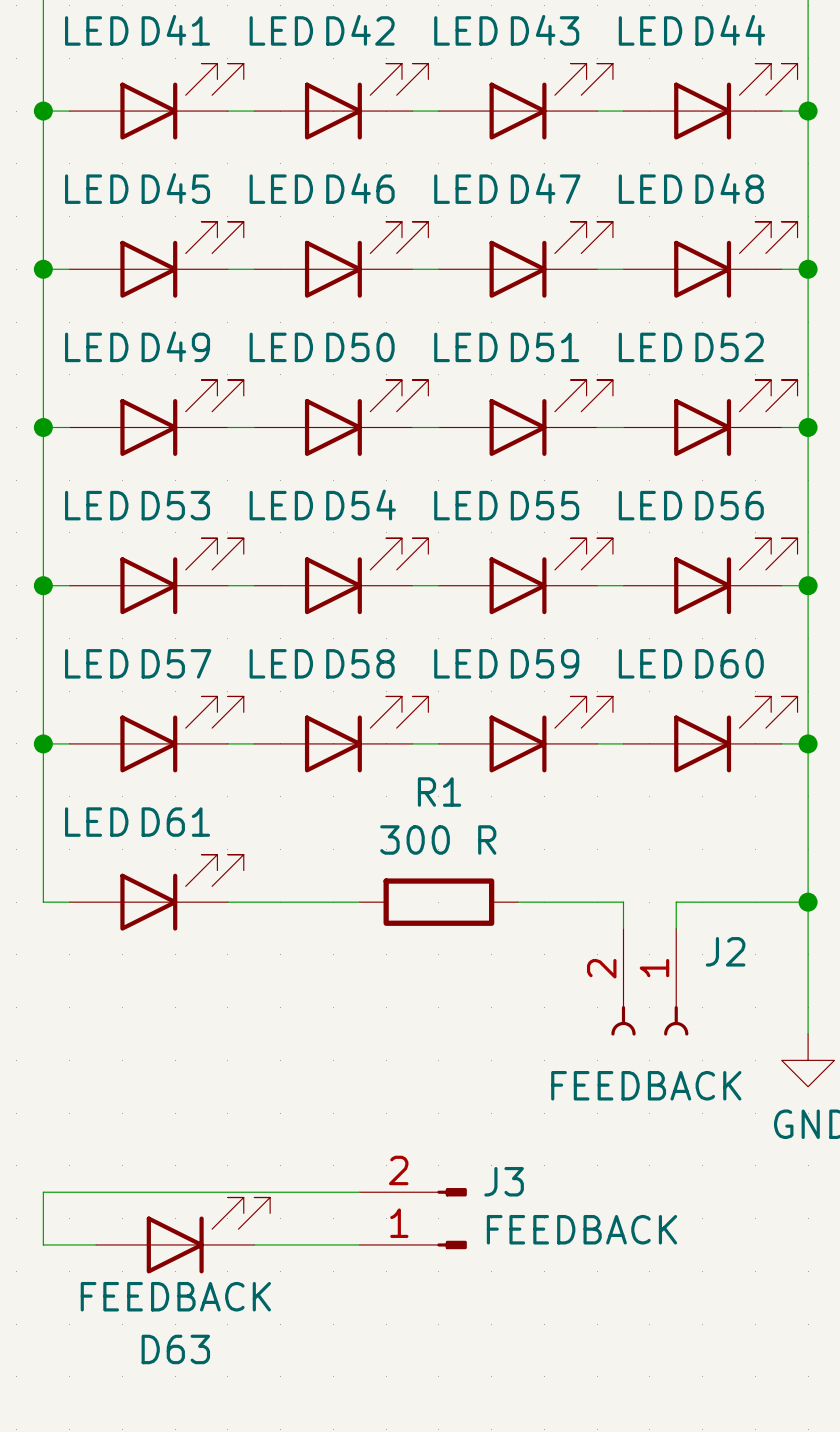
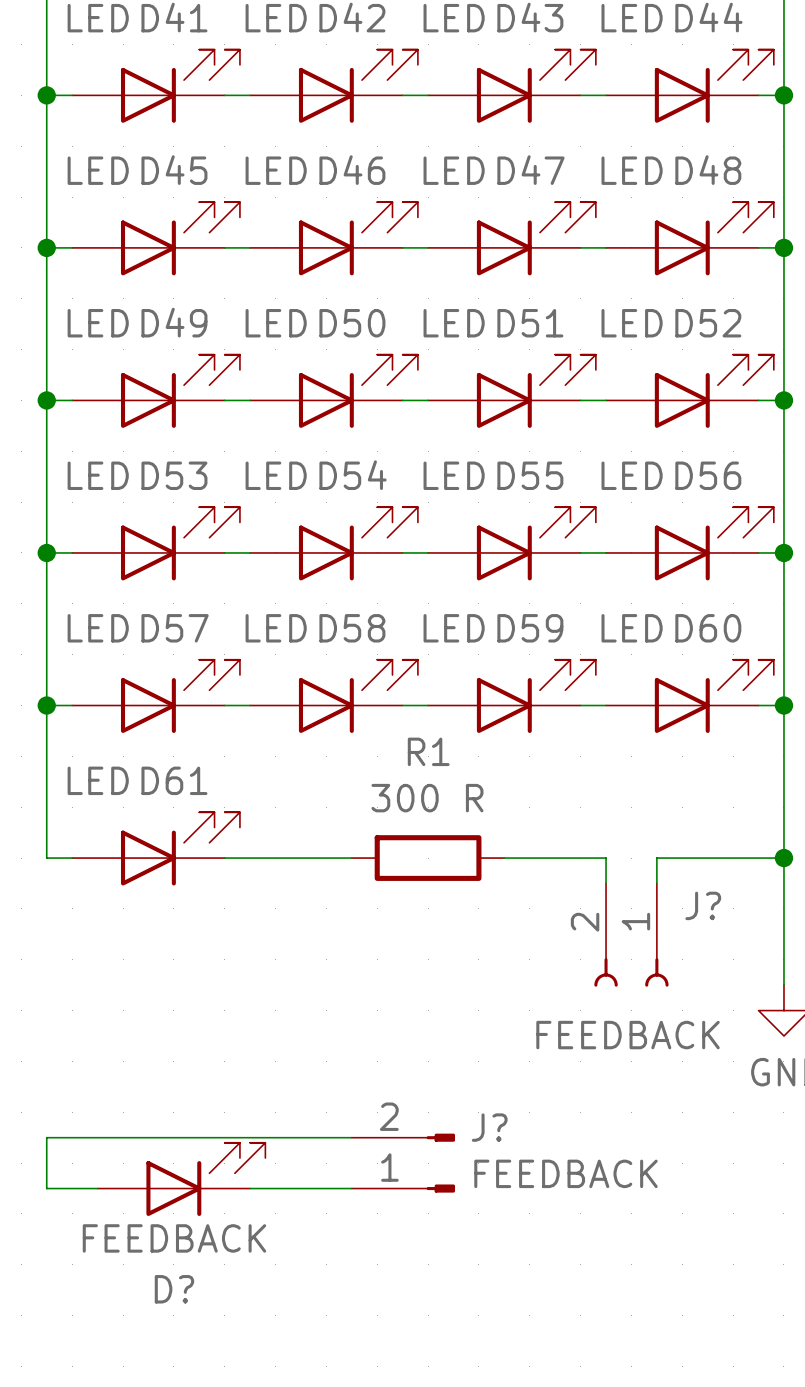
J2 name: J2 (725, 951) -> J? (703, 905)
J3 name: J3 (504, 1181) -> J? (489, 1127)
D63 name: D63 (175, 1349) -> D? (174, 1289)

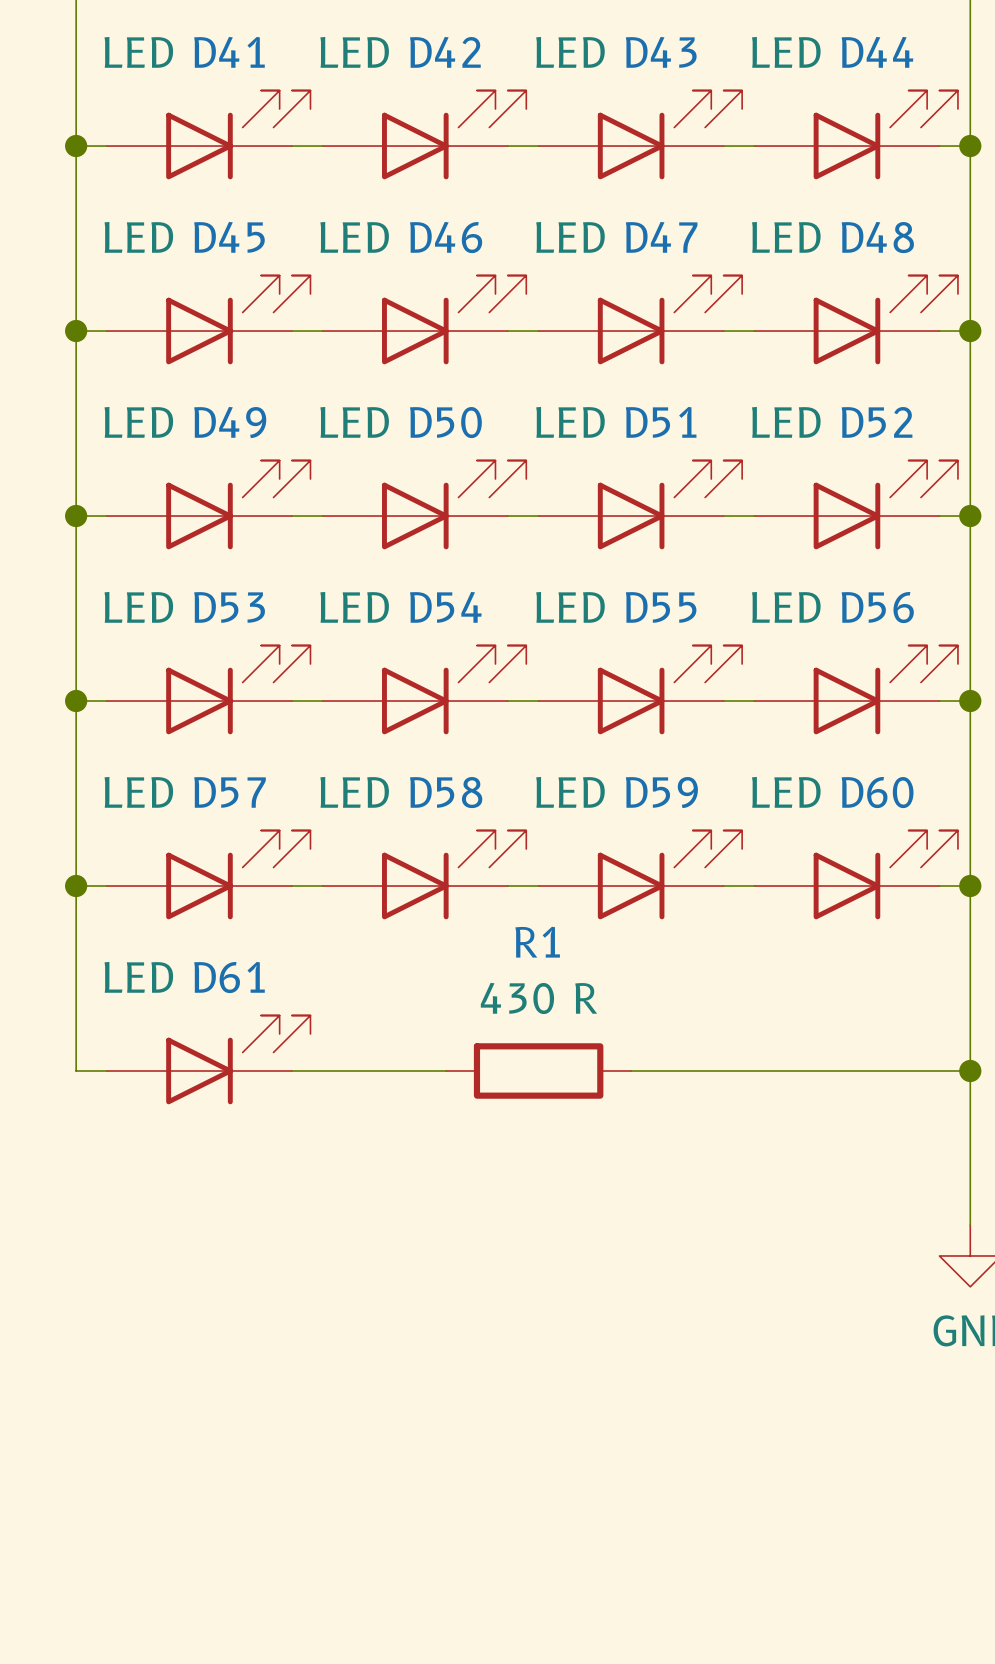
R1 value: 300 R (427, 798) -> 430 R (538, 998)
wire: (606, 858) (606, 883) -> (754, 1071) (816, 1071)
wire: (656, 858) (656, 883) -> none
J?: FEEDBACK (631, 935) -> none
wire: (351, 1137) (46, 1137) (46, 1188) (97, 1188) -> none
J?: FEEDBACK (403, 1163) -> none
D?: FEEDBACK (181, 1179) -> none
wire: (250, 1188) (351, 1188) -> none

